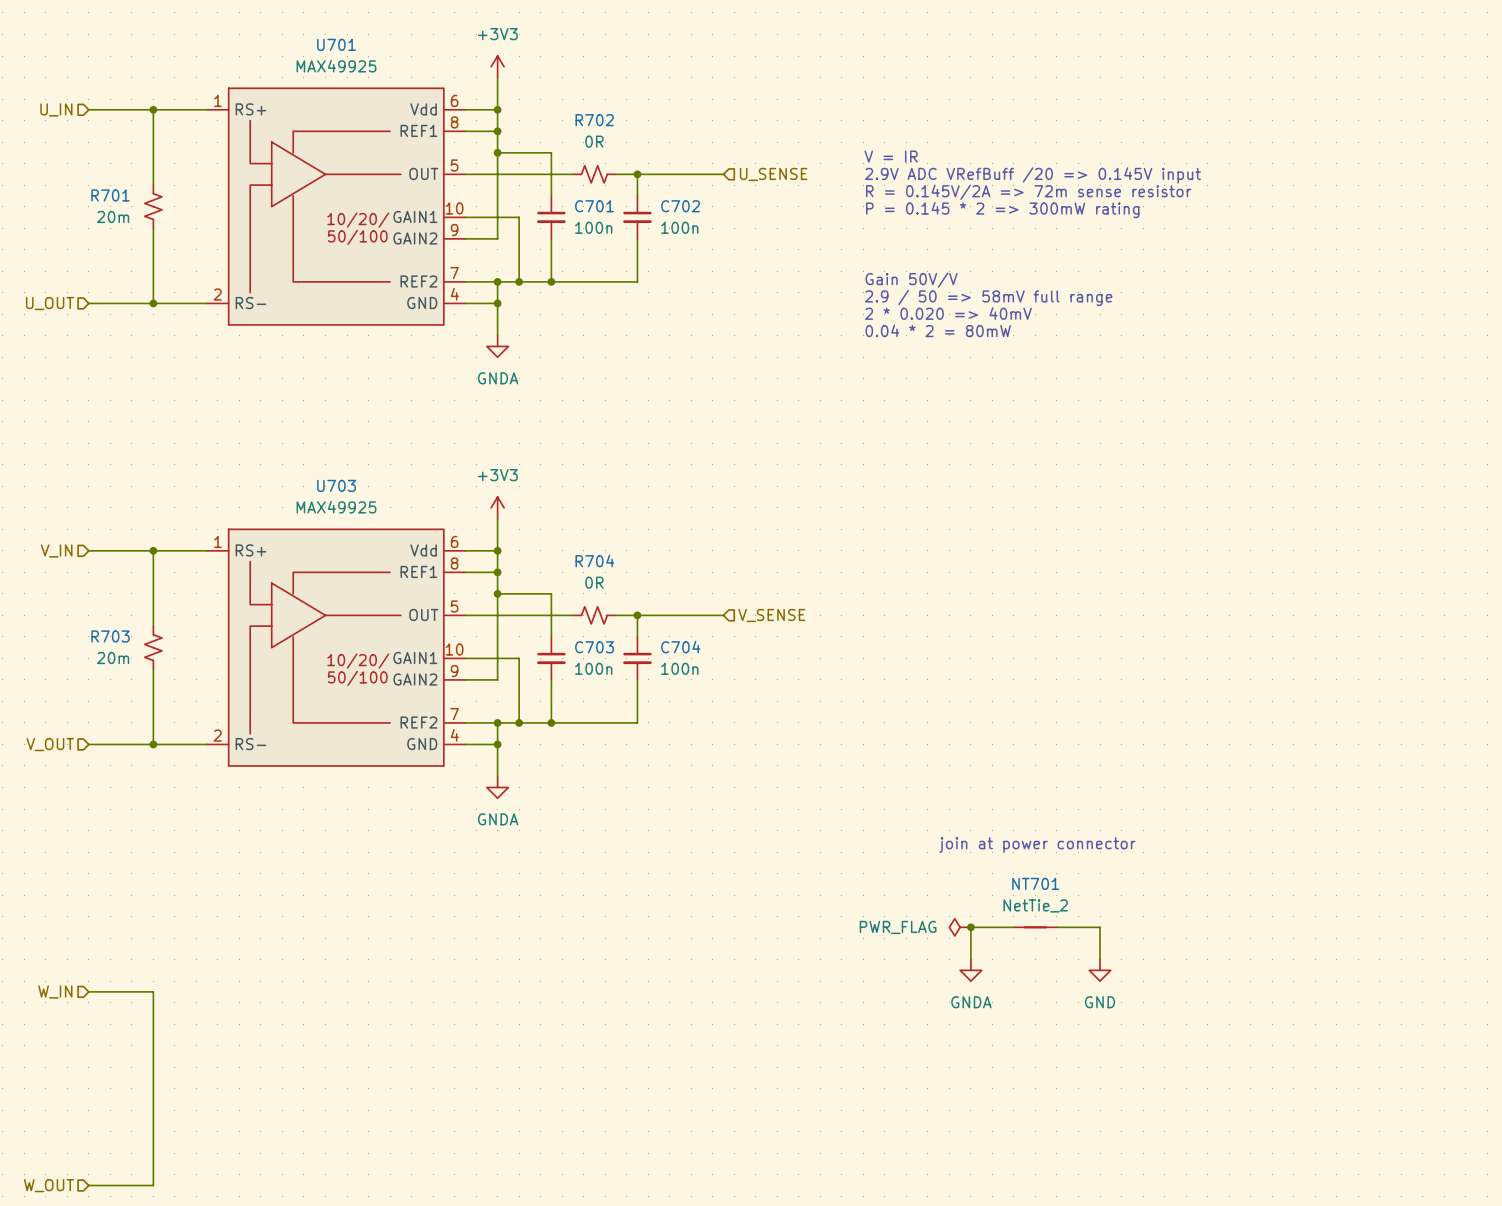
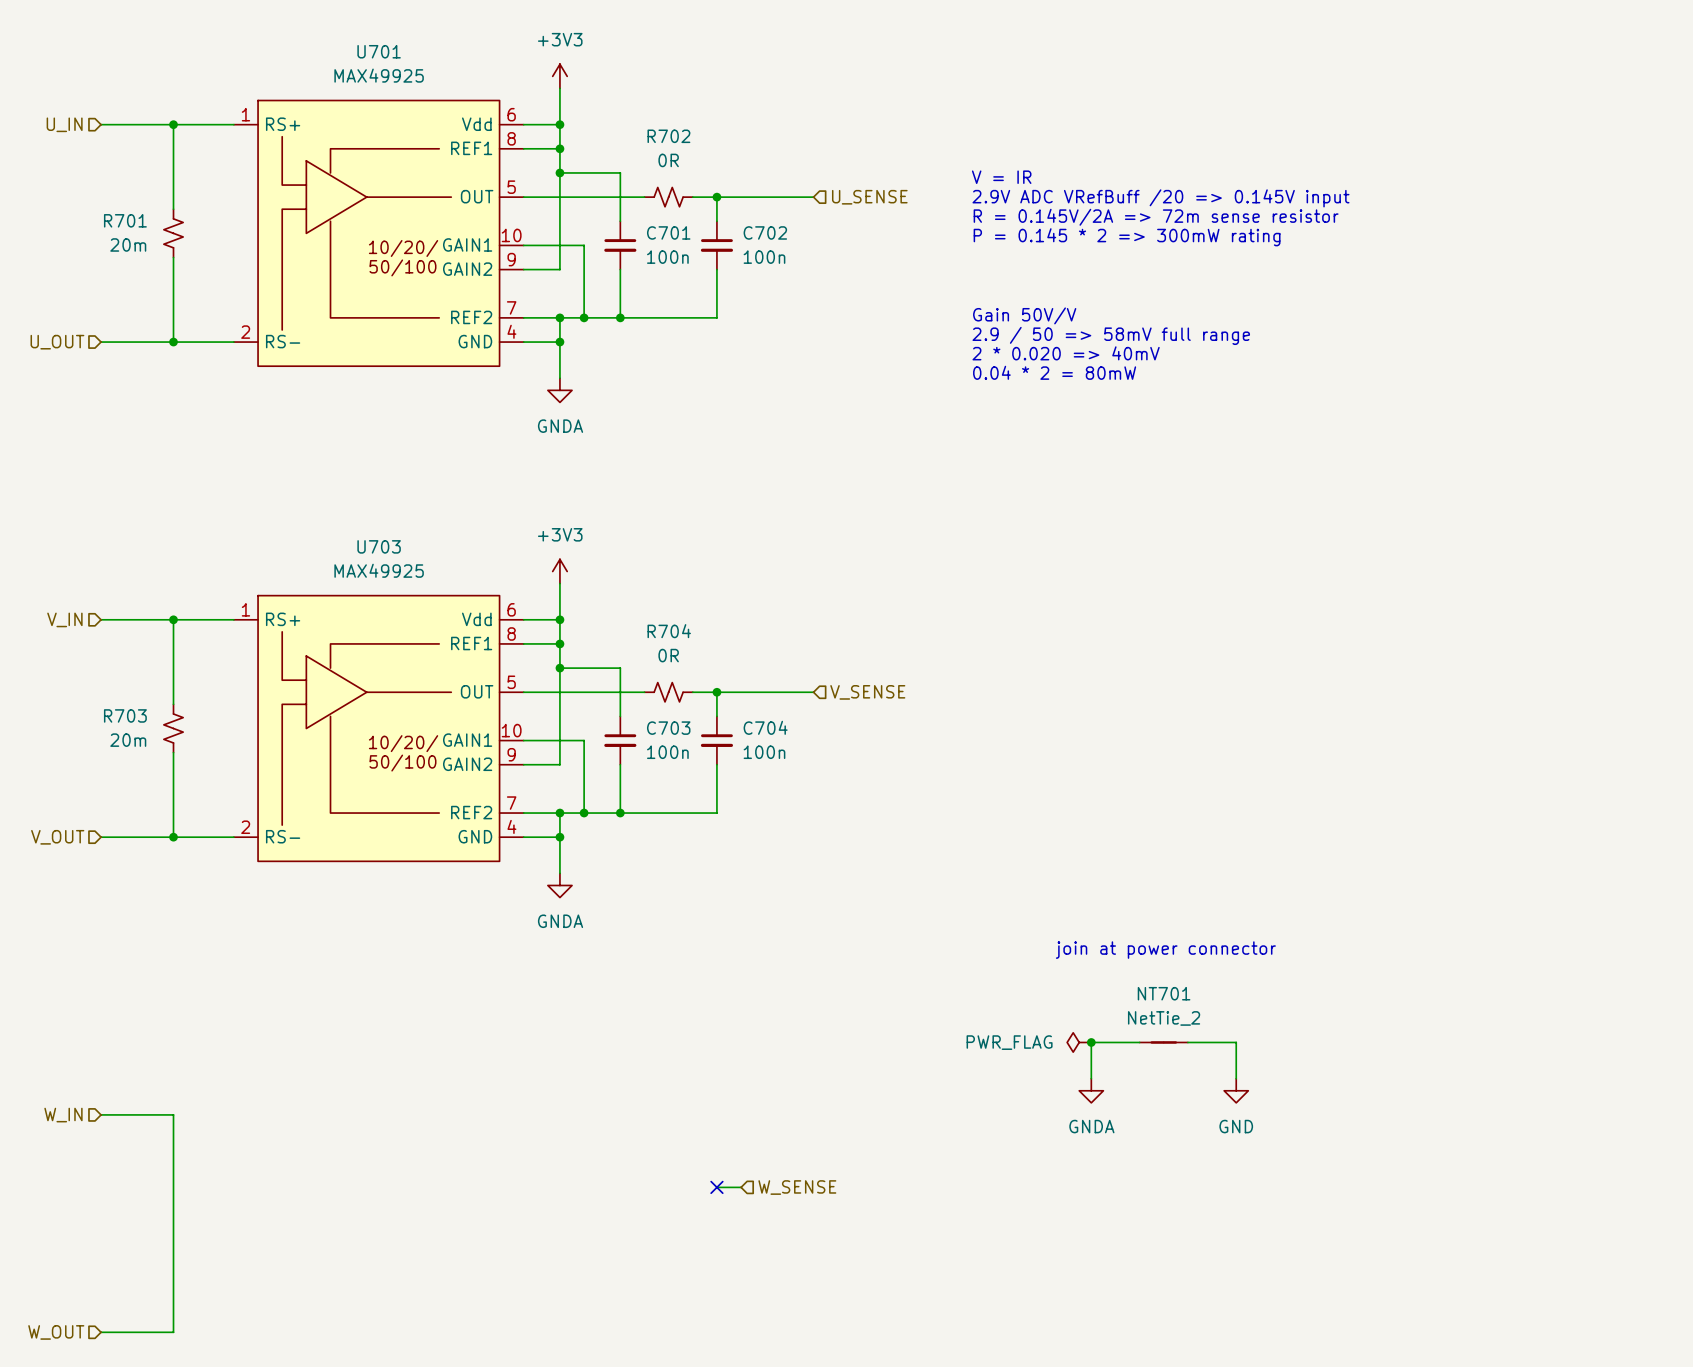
wire: none -> (716, 1187) (741, 1187)
no-connect mark: none -> (716, 1187)
hierarchical label: none -> W_SENSE (797, 1187)

